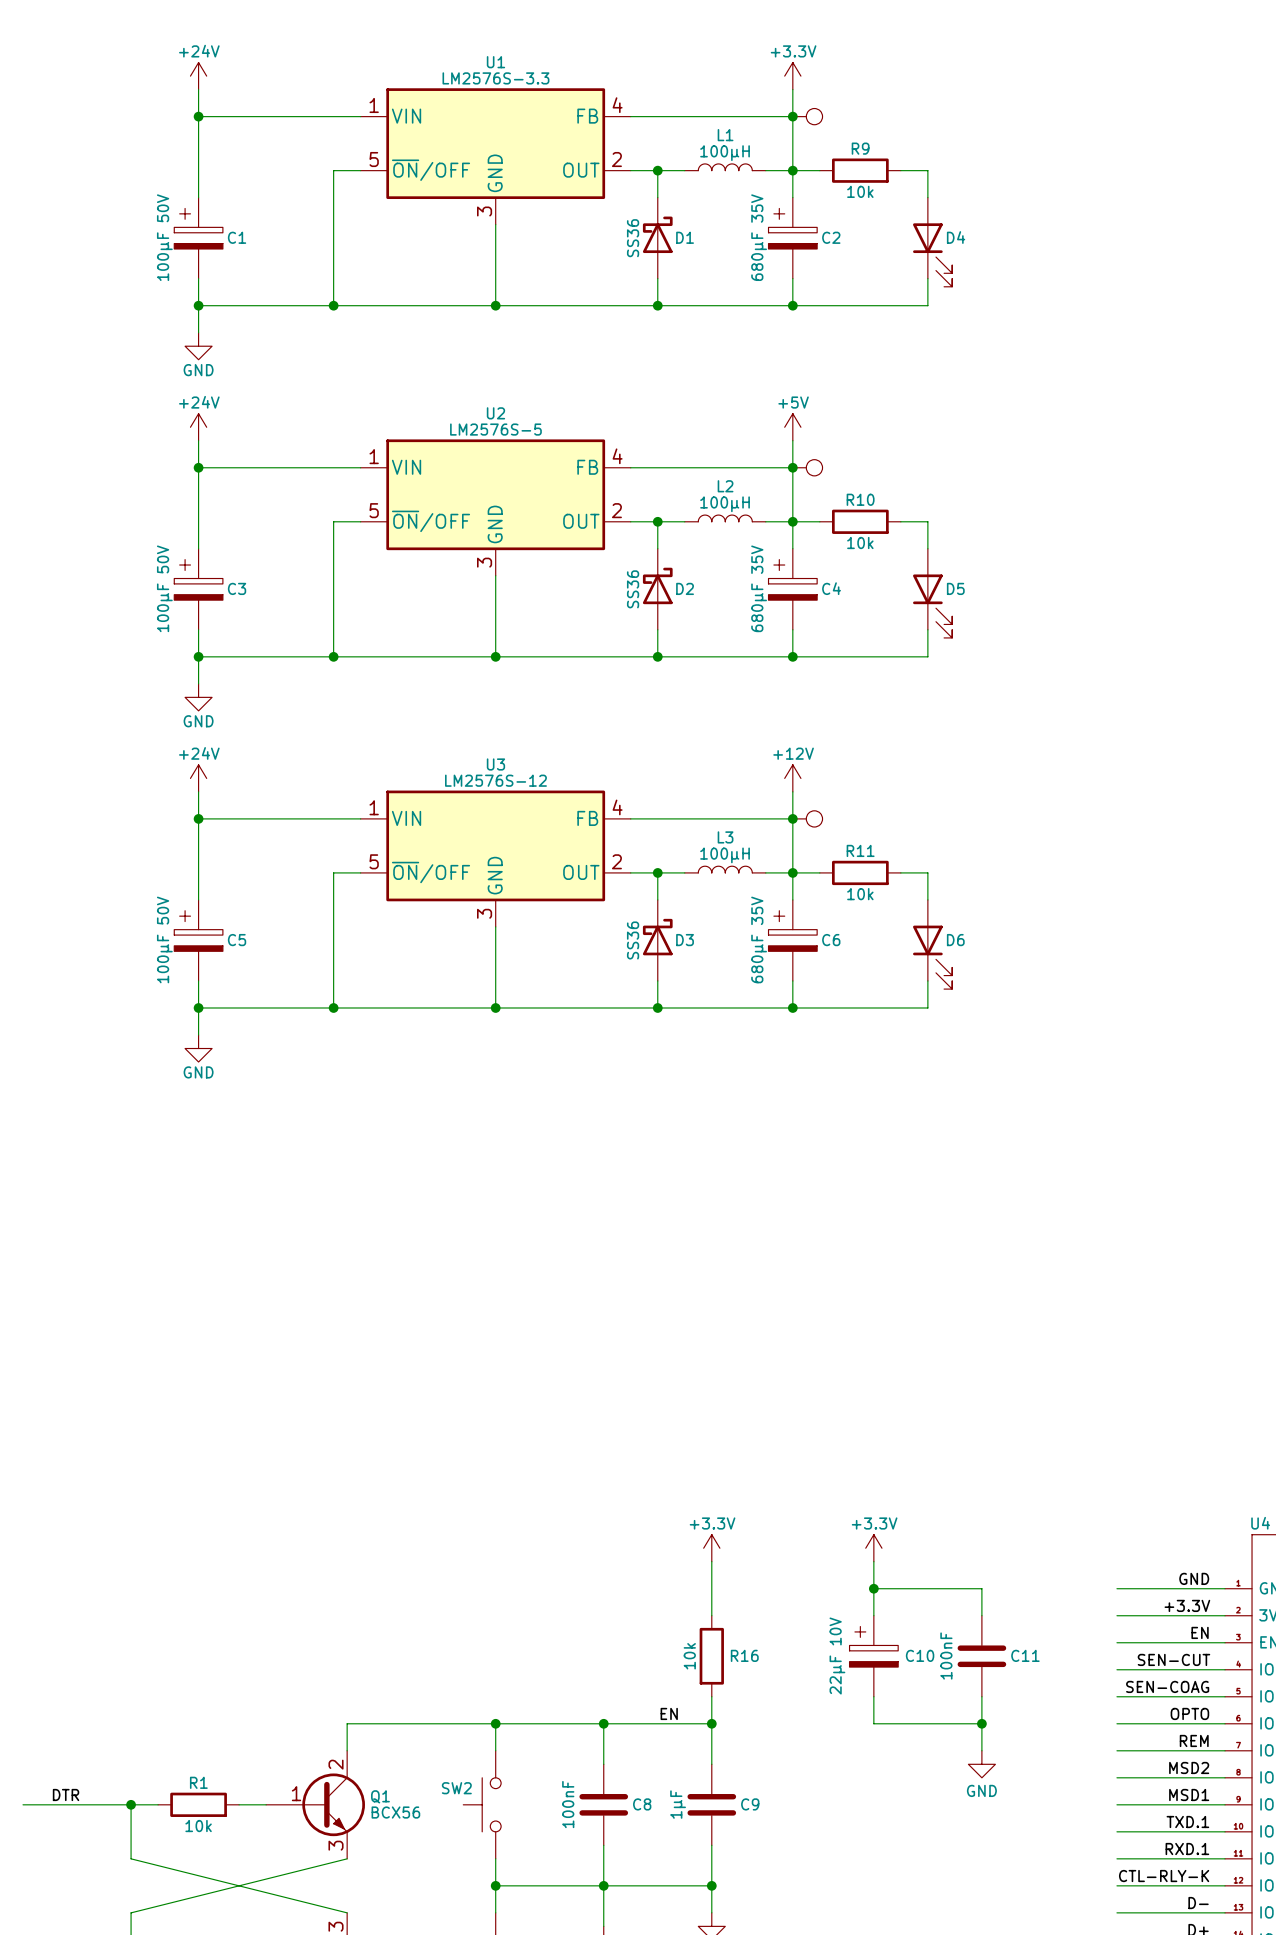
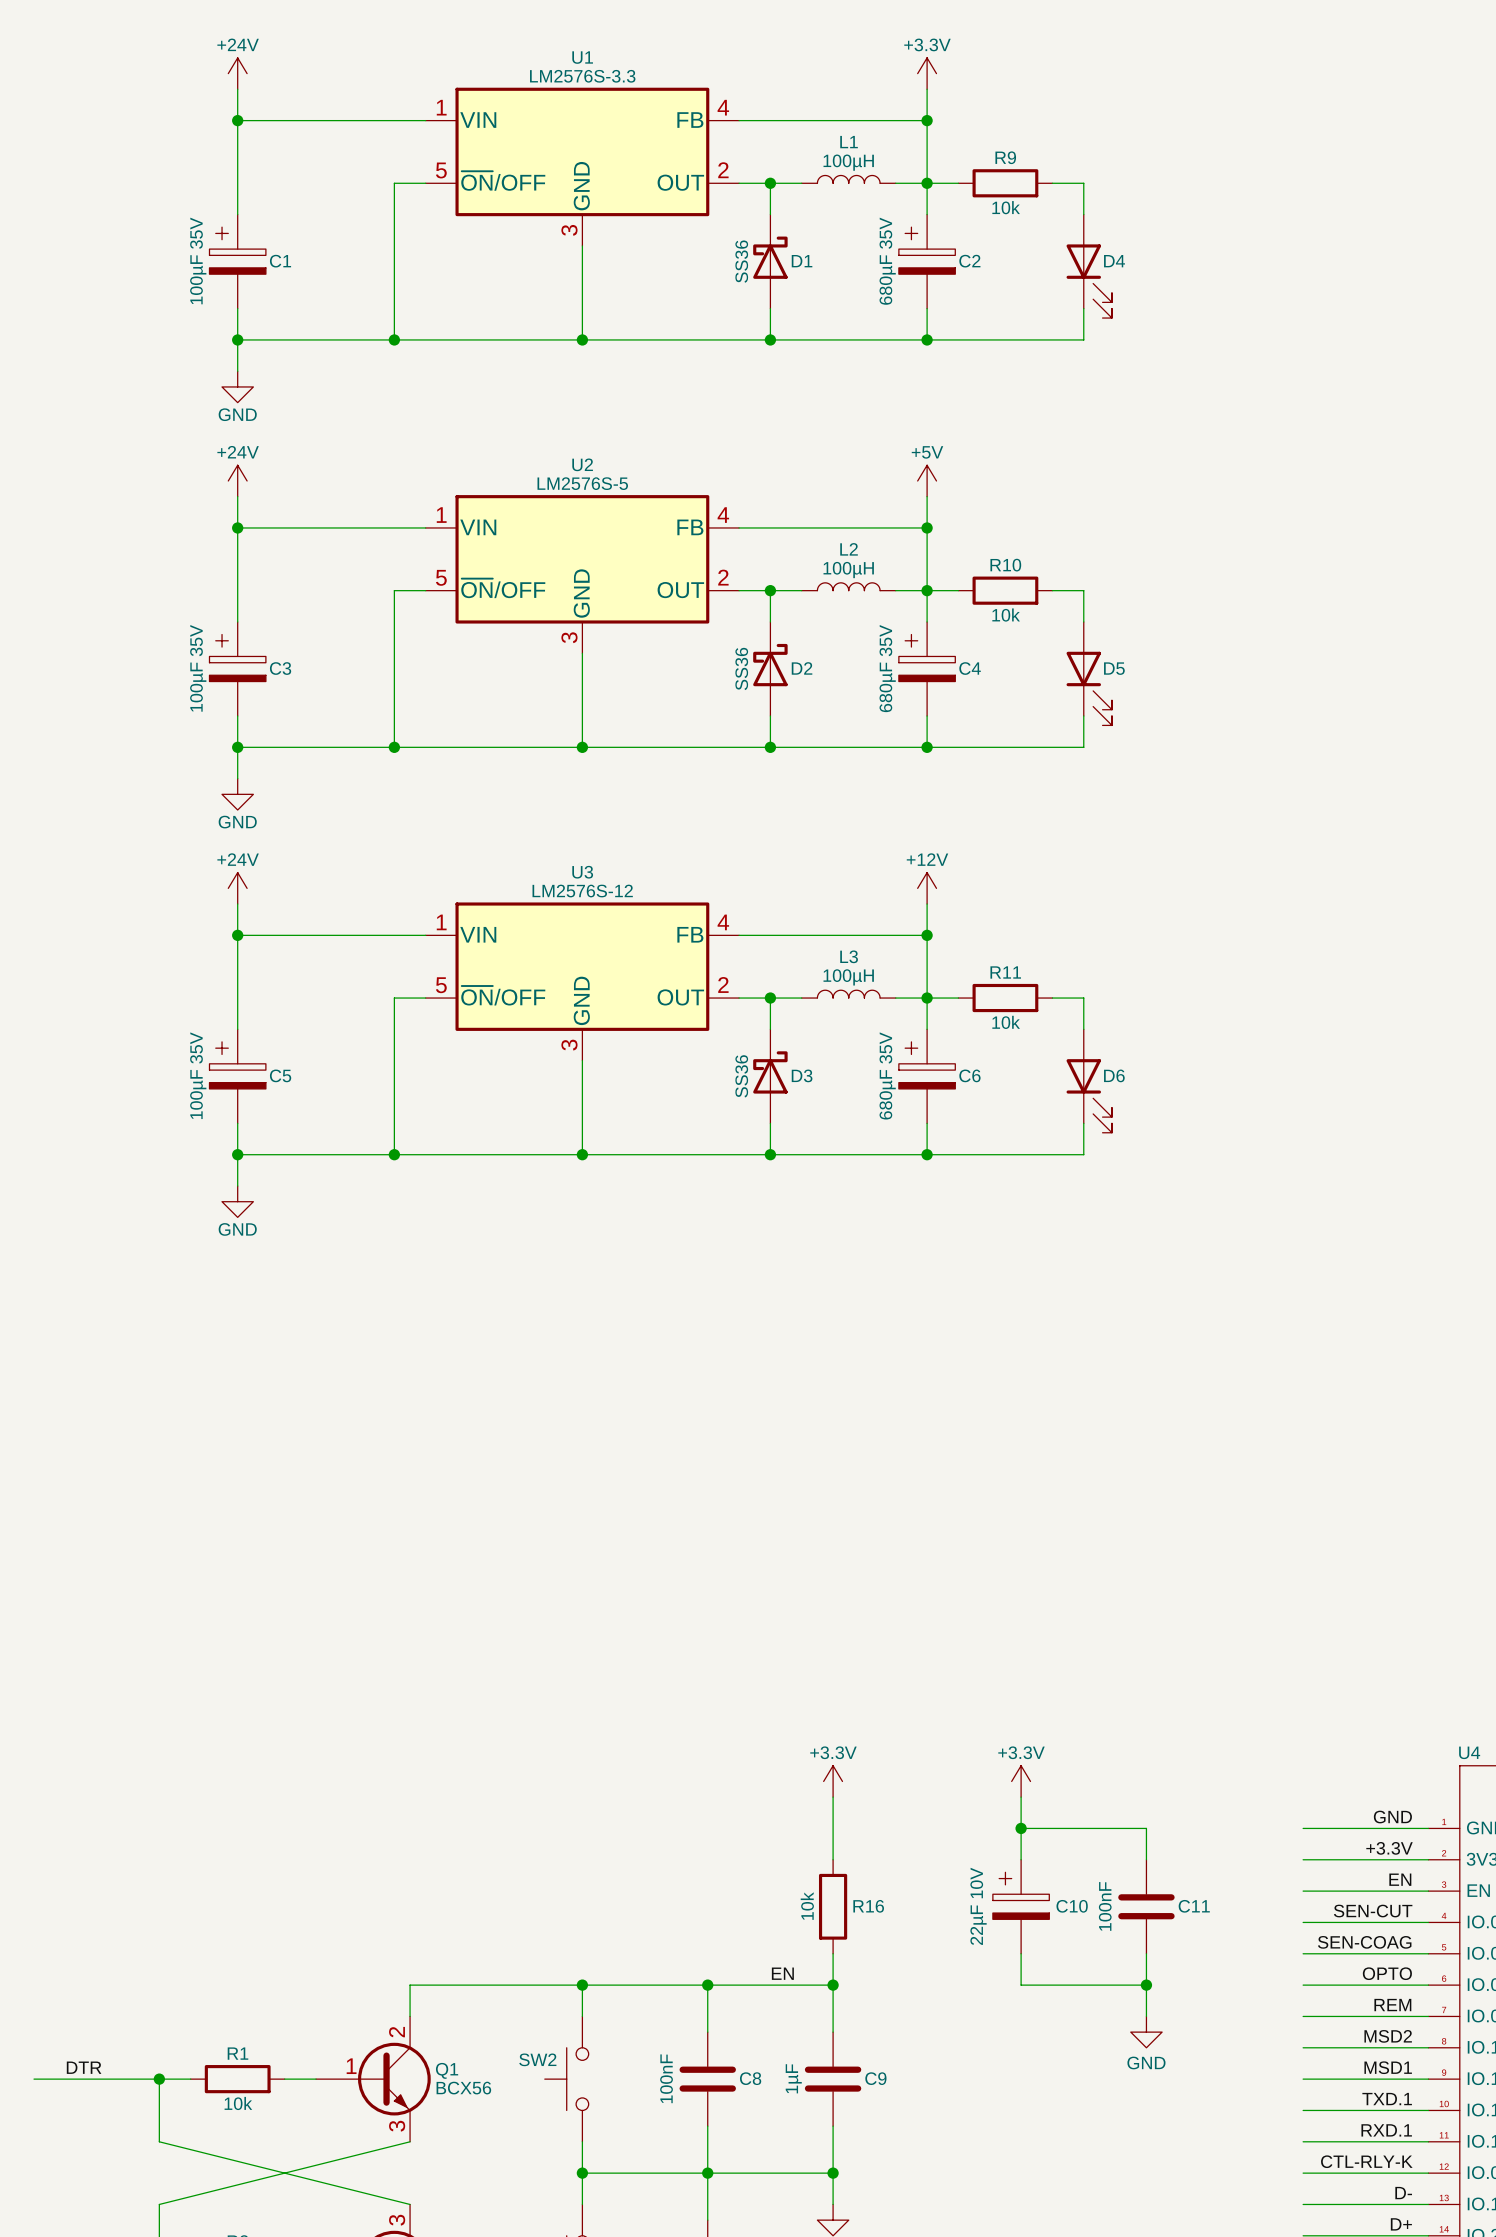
part: (807, 116) -> none
C1 value: 100µF 50V (164, 237) -> 100µF 35V (198, 260)
part: (807, 467) -> none
C3 value: 100µF 50V (164, 588) -> 100µF 35V (198, 668)
part: (807, 818) -> none
C5 value: 100µF 50V (164, 939) -> 100µF 35V (198, 1075)

